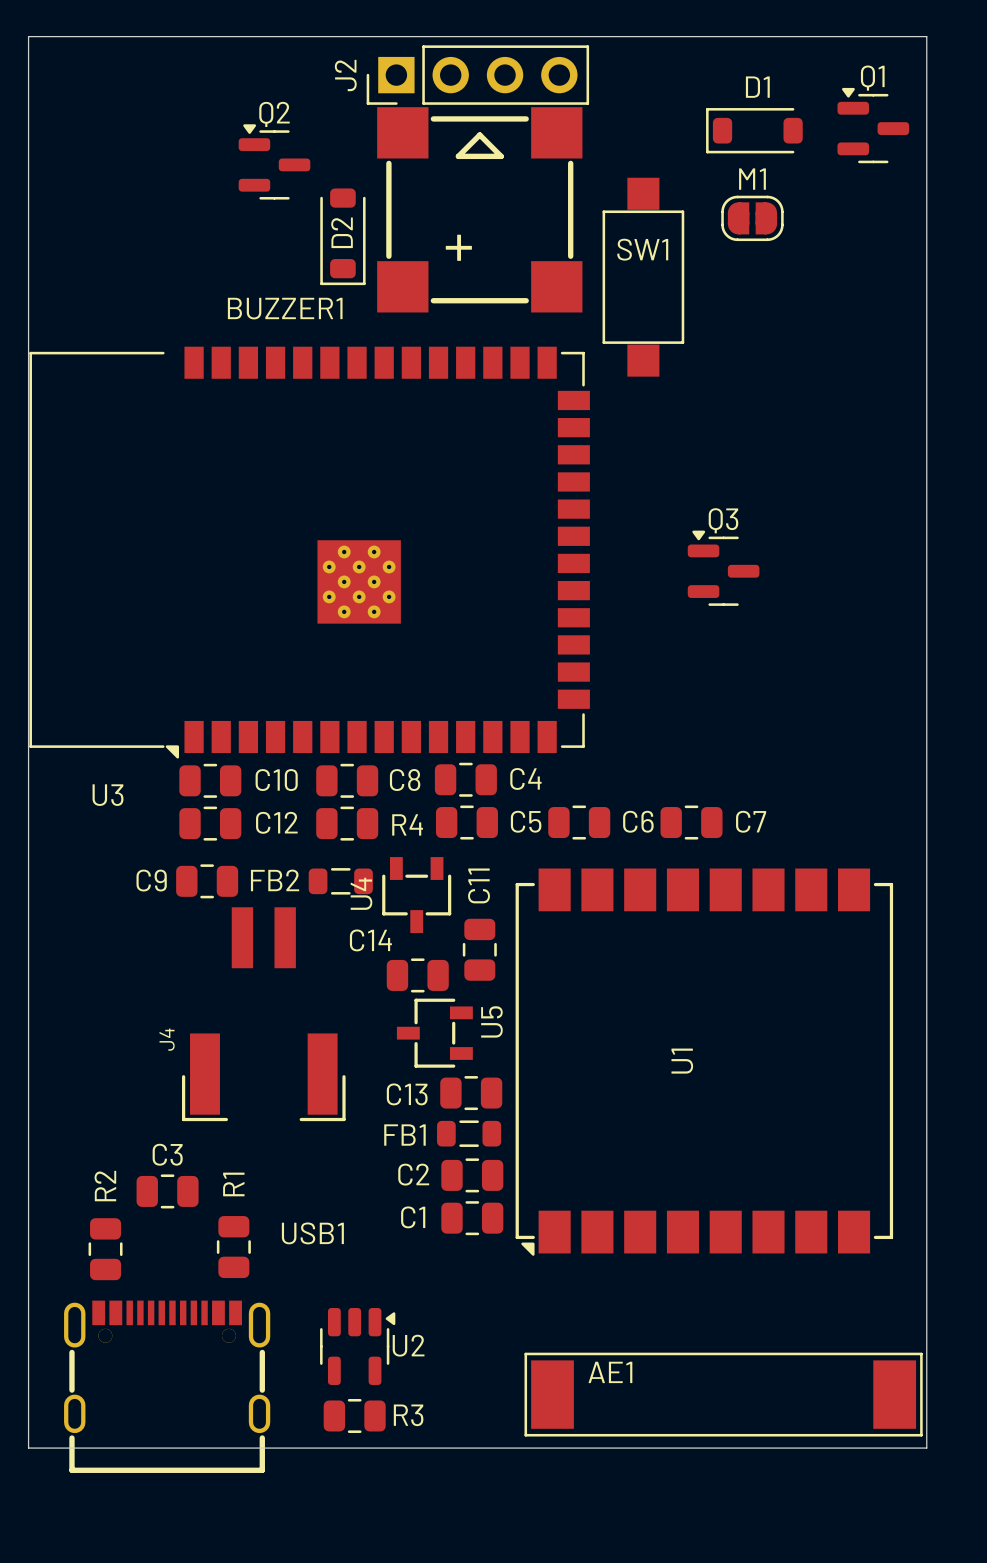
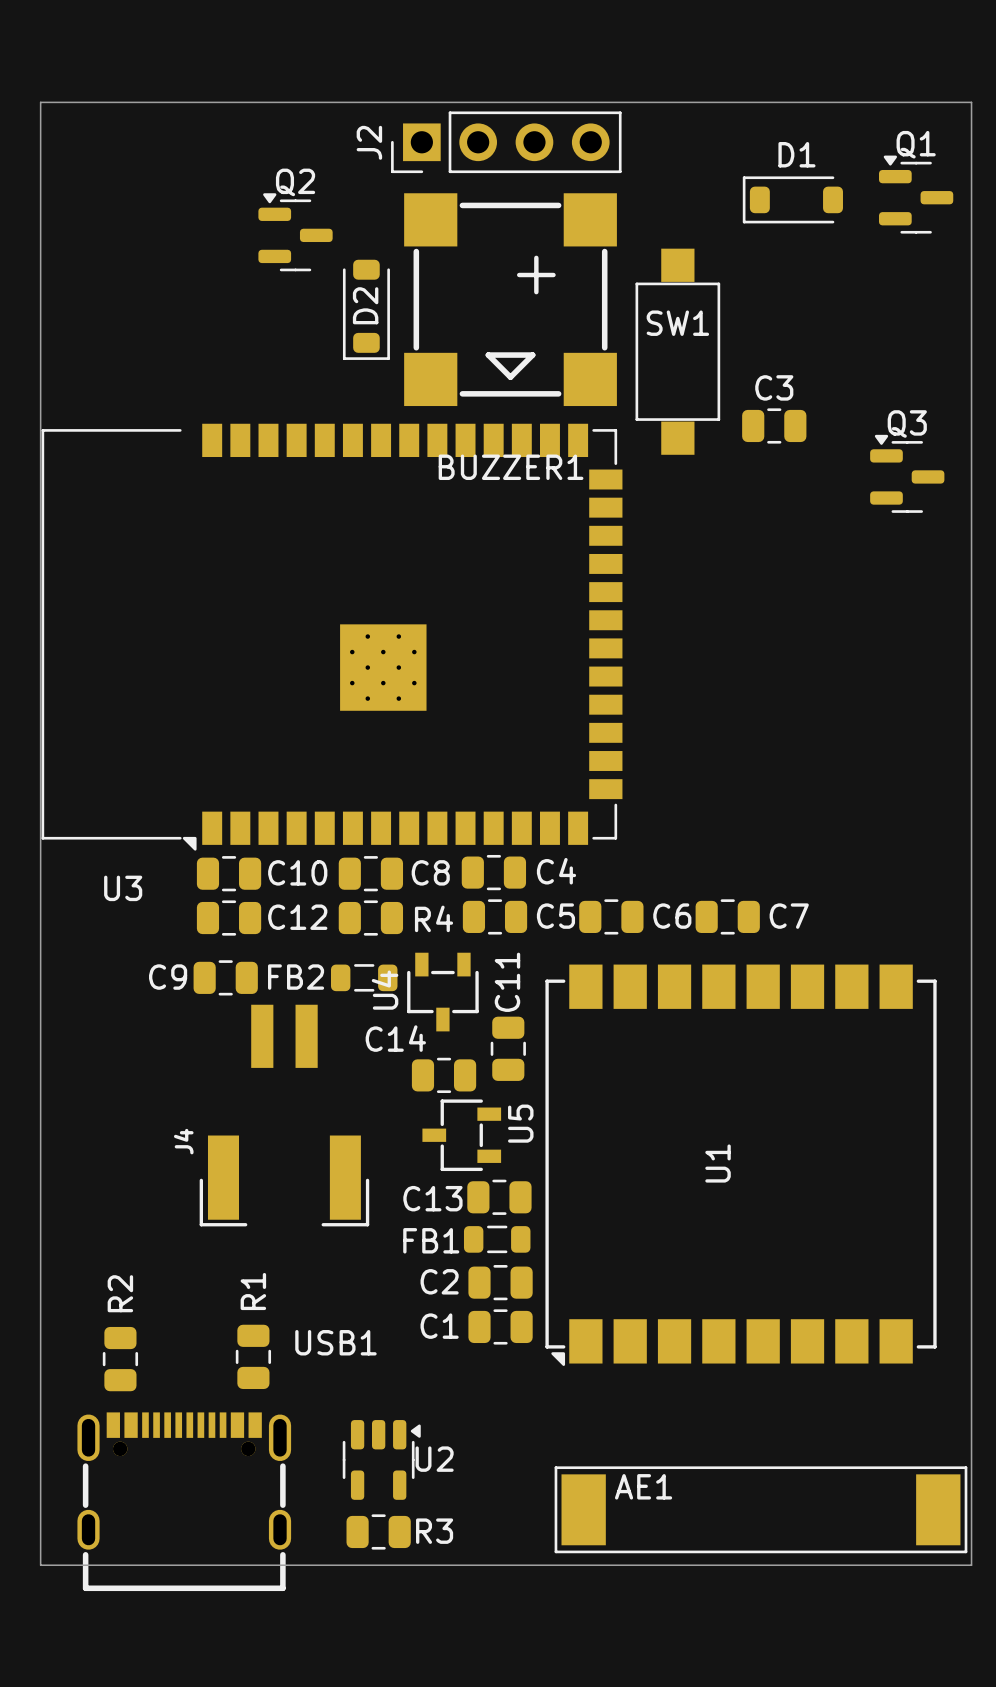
BUZZER1 rotation: 0° (479, 209) -> 180° (510, 299)
M1: (752, 218) -> none
BUZZER1 name position: BUZZER1 (285, 308) -> BUZZER1 (511, 467)
Q3 position: (723, 568) -> (907, 473)
C3 position: (167, 1191) -> (774, 425)

